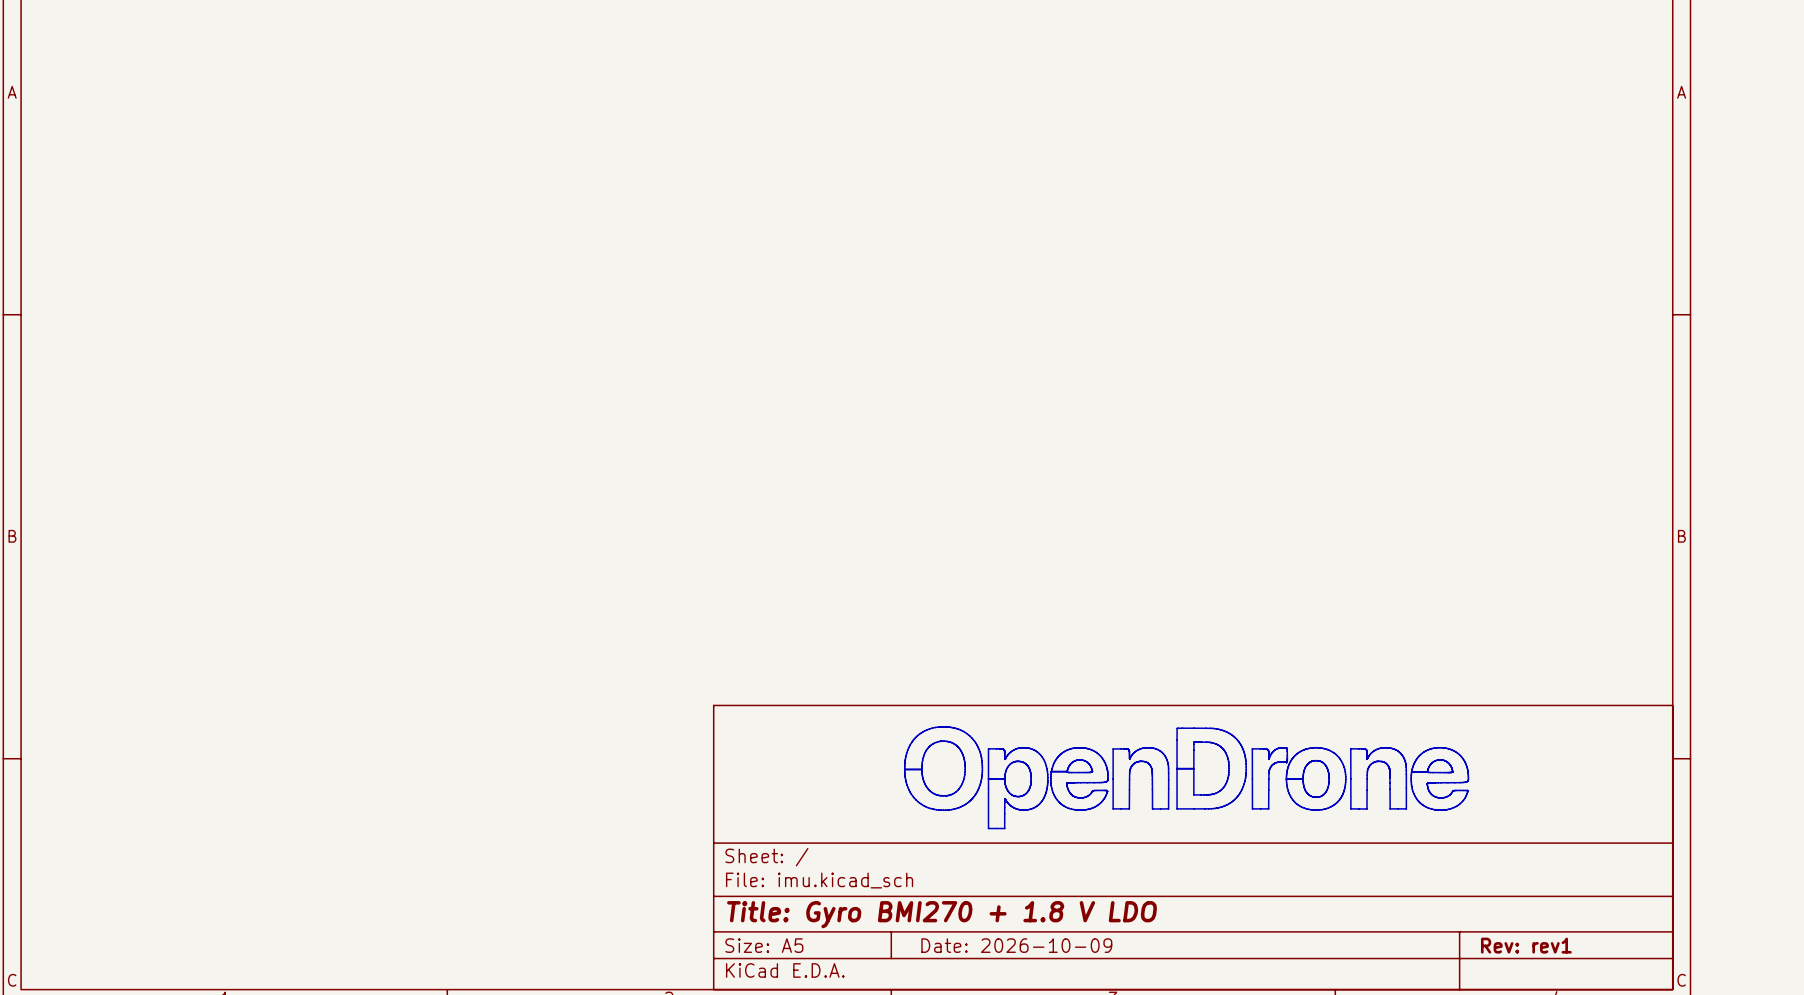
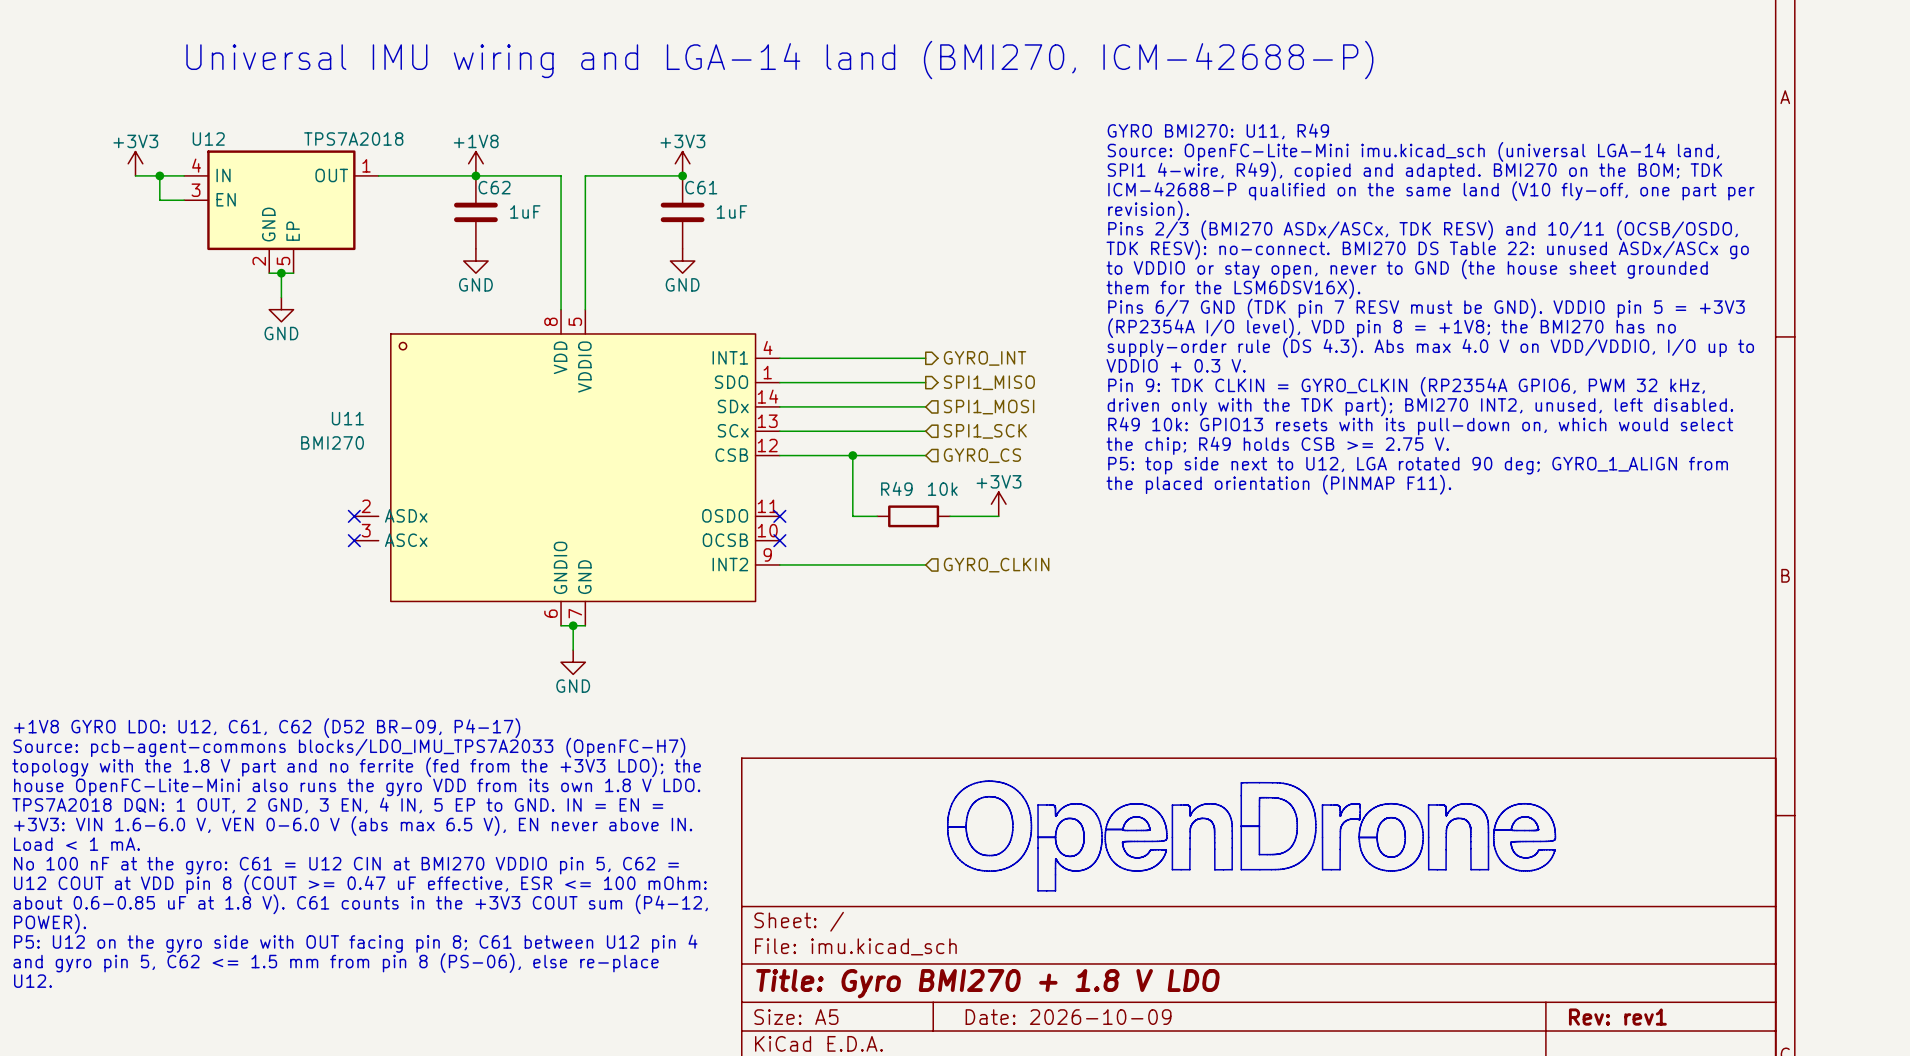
text: none -> Universal IMU wiring and LGA-14 land (BMI270, ICM-42688-P) (779, 60)
text: none -> GYRO BMI270: U11, R49 (1218, 131)
text: none -> Source: OpenFC-Lite-Mini imu.kicad_sch (universal LGA-14 land, (1413, 151)
power symbol: none -> +3V3 (135, 163)
power symbol: none -> +1V8 (475, 163)
power symbol: none -> +3V3 (682, 163)
text: none -> SPI1 4-wire, R49), copied and adapted. BMI270 on the BOM; TDK (1414, 171)
wire: none -> (135, 175) (184, 175)
wire: none -> (159, 175) (159, 200) (184, 200)
junction: none -> (159, 175)
wire: none -> (378, 175) (561, 175) (561, 309)
junction: none -> (475, 175)
wire: none -> (682, 175) (585, 175) (585, 309)
junction: none -> (682, 175)
text: none -> ICM-42688-P qualified on the same land (V10 fly-off, one part per (1431, 191)
text: none -> revision). (1148, 210)
U12: none -> TPS7A2018 (281, 211)
C62: none -> 1uF (475, 212)
C61: none -> 1uF (682, 212)
text: none -> Pins 2/3 (BMI270 ASDx/ASCx, TDK RESV) and 10/11 (OCSB/OSDO, (1423, 230)
text: none -> TDK RESV): no-connect. BMI270 DS Table 22: unused ASDx/ASCx go (1427, 249)
power symbol: none -> GND (475, 261)
power symbol: none -> GND (682, 261)
text: none -> to VDDIO or stay open, never to GND (the house sheet grounded (1407, 269)
wire: none -> (269, 273) (293, 273)
wire: none -> (281, 273) (281, 297)
junction: none -> (281, 273)
text: none -> them for the LSM6DSV16X). (1233, 288)
text: none -> Pins 6/7 GND (TDK pin 7 RESV must be GND). VDDIO pin 5 = +3V3 (1426, 308)
power symbol: none -> GND (281, 309)
text: none -> (RP2354A I/O level), VDD pin 8 = +1V8; the BMI270 has no (1392, 328)
text: none -> supply-order rule (DS 4.3). Abs max 4.0 V on VDD/VDDIO, I/O up to (1430, 347)
wire: none -> (779, 358) (925, 358)
hierarchical label: none -> GYRO_INT (985, 358)
text: none -> VDDIO + 0.3 V. (1176, 365)
wire: none -> (779, 382) (925, 382)
hierarchical label: none -> SPI1_MISO (989, 382)
text: none -> Pin 9: TDK CLKIN = GYRO_CLKIN (RP2354A GPIO6, PWM 32 kHz, (1406, 386)
wire: none -> (779, 406) (925, 406)
hierarchical label: none -> SPI1_MOSI (989, 407)
text: none -> driven only with the TDK part); BMI270 INT2, unused, left disabled. (1420, 406)
text: none -> R49 10k: GPIO13 resets with its pull-down on, which would select (1420, 426)
wire: none -> (779, 431) (925, 431)
hierarchical label: none -> SPI1_SCK (985, 431)
text: none -> the chip; R49 holds CSB >= 2.75 V. (1277, 445)
wire: none -> (779, 455) (925, 455)
wire: none -> (852, 455) (852, 516) (877, 516)
junction: none -> (852, 455)
hierarchical label: none -> GYRO_CS (982, 455)
text: none -> P5: top side next to U12, LGA rotated 90 deg; GYRO_1_ALIGN from (1418, 465)
U11: none -> BMI270 (567, 467)
text: none -> the placed orientation (PINMAP F11). (1278, 484)
power symbol: none -> +3V3 (998, 504)
no-connect mark: none -> (354, 516)
no-connect mark: none -> (779, 516)
R49: none -> 10k (913, 516)
wire: none -> (950, 516) (998, 516)
no-connect mark: none -> (354, 540)
no-connect mark: none -> (779, 540)
wire: none -> (779, 564) (925, 564)
hierarchical label: none -> GYRO_CLKIN (996, 565)
wire: none -> (561, 625) (585, 625)
wire: none -> (573, 625) (573, 650)
junction: none -> (573, 625)
power symbol: none -> GND (573, 662)
text: none -> +1V8 GYRO LDO: U12, C61, C62 (D52 BR-09, P4-17) (267, 728)
text: none -> Source: pcb-agent-commons blocks/LDO_IMU_TPS7A2033 (OpenFC-H7) (349, 747)
text: none -> topology with the 1.8 V part and no ferrite (fed from the +3V3 LDO); the (356, 767)
text: none -> house OpenFC-Lite-Mini also runs the gyro VDD from its own 1.8 V LDO. (357, 787)
text: none -> TPS7A2018 DQN: 1 OUT, 2 GND, 3 EN, 4 IN, 5 EP to GND. IN = EN = (337, 805)
text: none -> +3V3: VIN 1.6-6.0 V, VEN 0-6.0 V (abs max 6.5 V), EN never above IN. (353, 825)
text: none -> Load < 1 mA. (76, 844)
text: none -> No 100 nF at the gyro: C61 = U12 CIN at BMI270 VDDIO pin 5, C62 = (346, 865)
text: none -> U12 COUT at VDD pin 8 (COUT >= 0.47 uF effective, ESR <= 100 mOhm: (360, 884)
text: none -> about 0.6-0.85 uF at 1.8 V). C61 counts in the +3V3 COUT sum (P4-12, (360, 904)
text: none -> POWER). (50, 923)
text: none -> P5: U12 on the gyro side with OUT facing pin 8; C61 between U12 pin 4 (355, 943)
text: none -> and gyro pin 5, C62 <= 1.5 mm from pin 8 (PS-06), else re-place (336, 962)
text: none -> U12. (32, 981)

